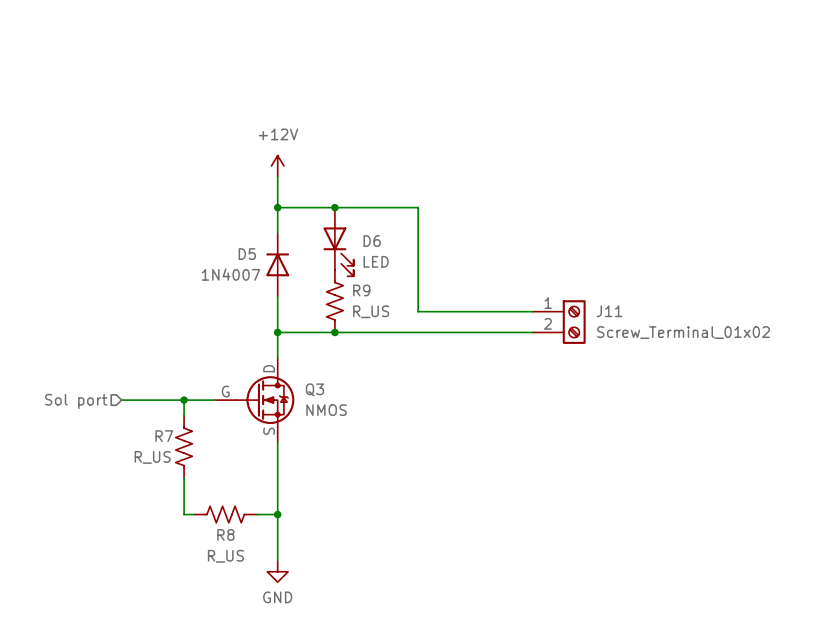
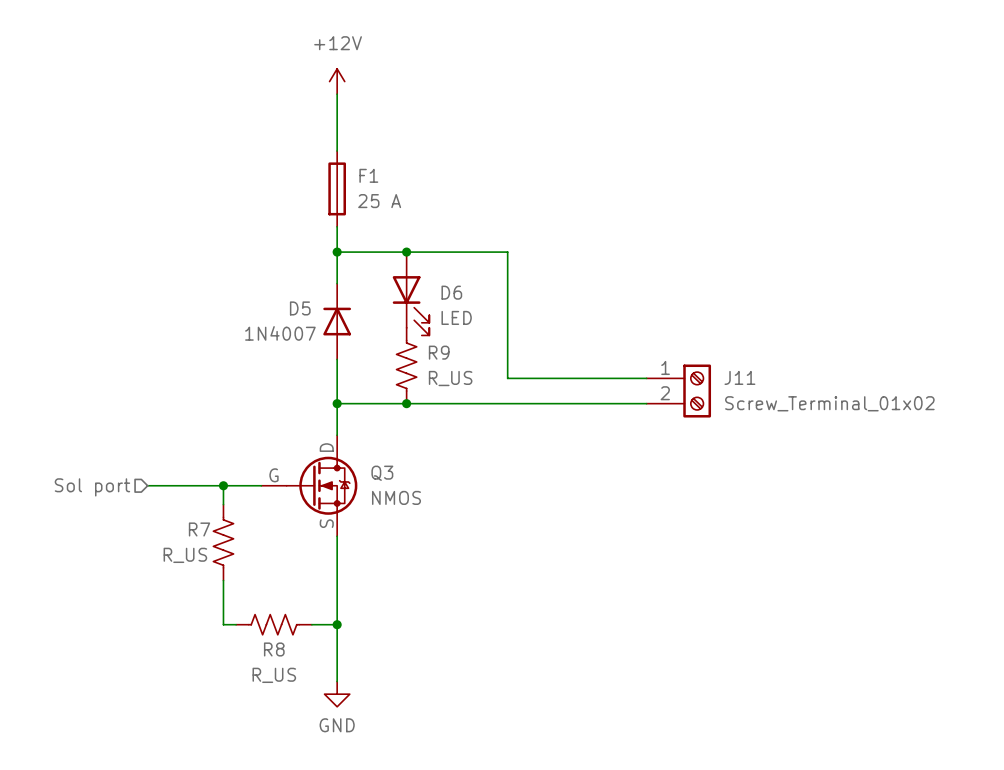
wire: none -> (337, 94) (337, 151)
F1: none -> 25 A (337, 188)
power symbol position: +12V (277, 166) -> +12V (337, 81)

